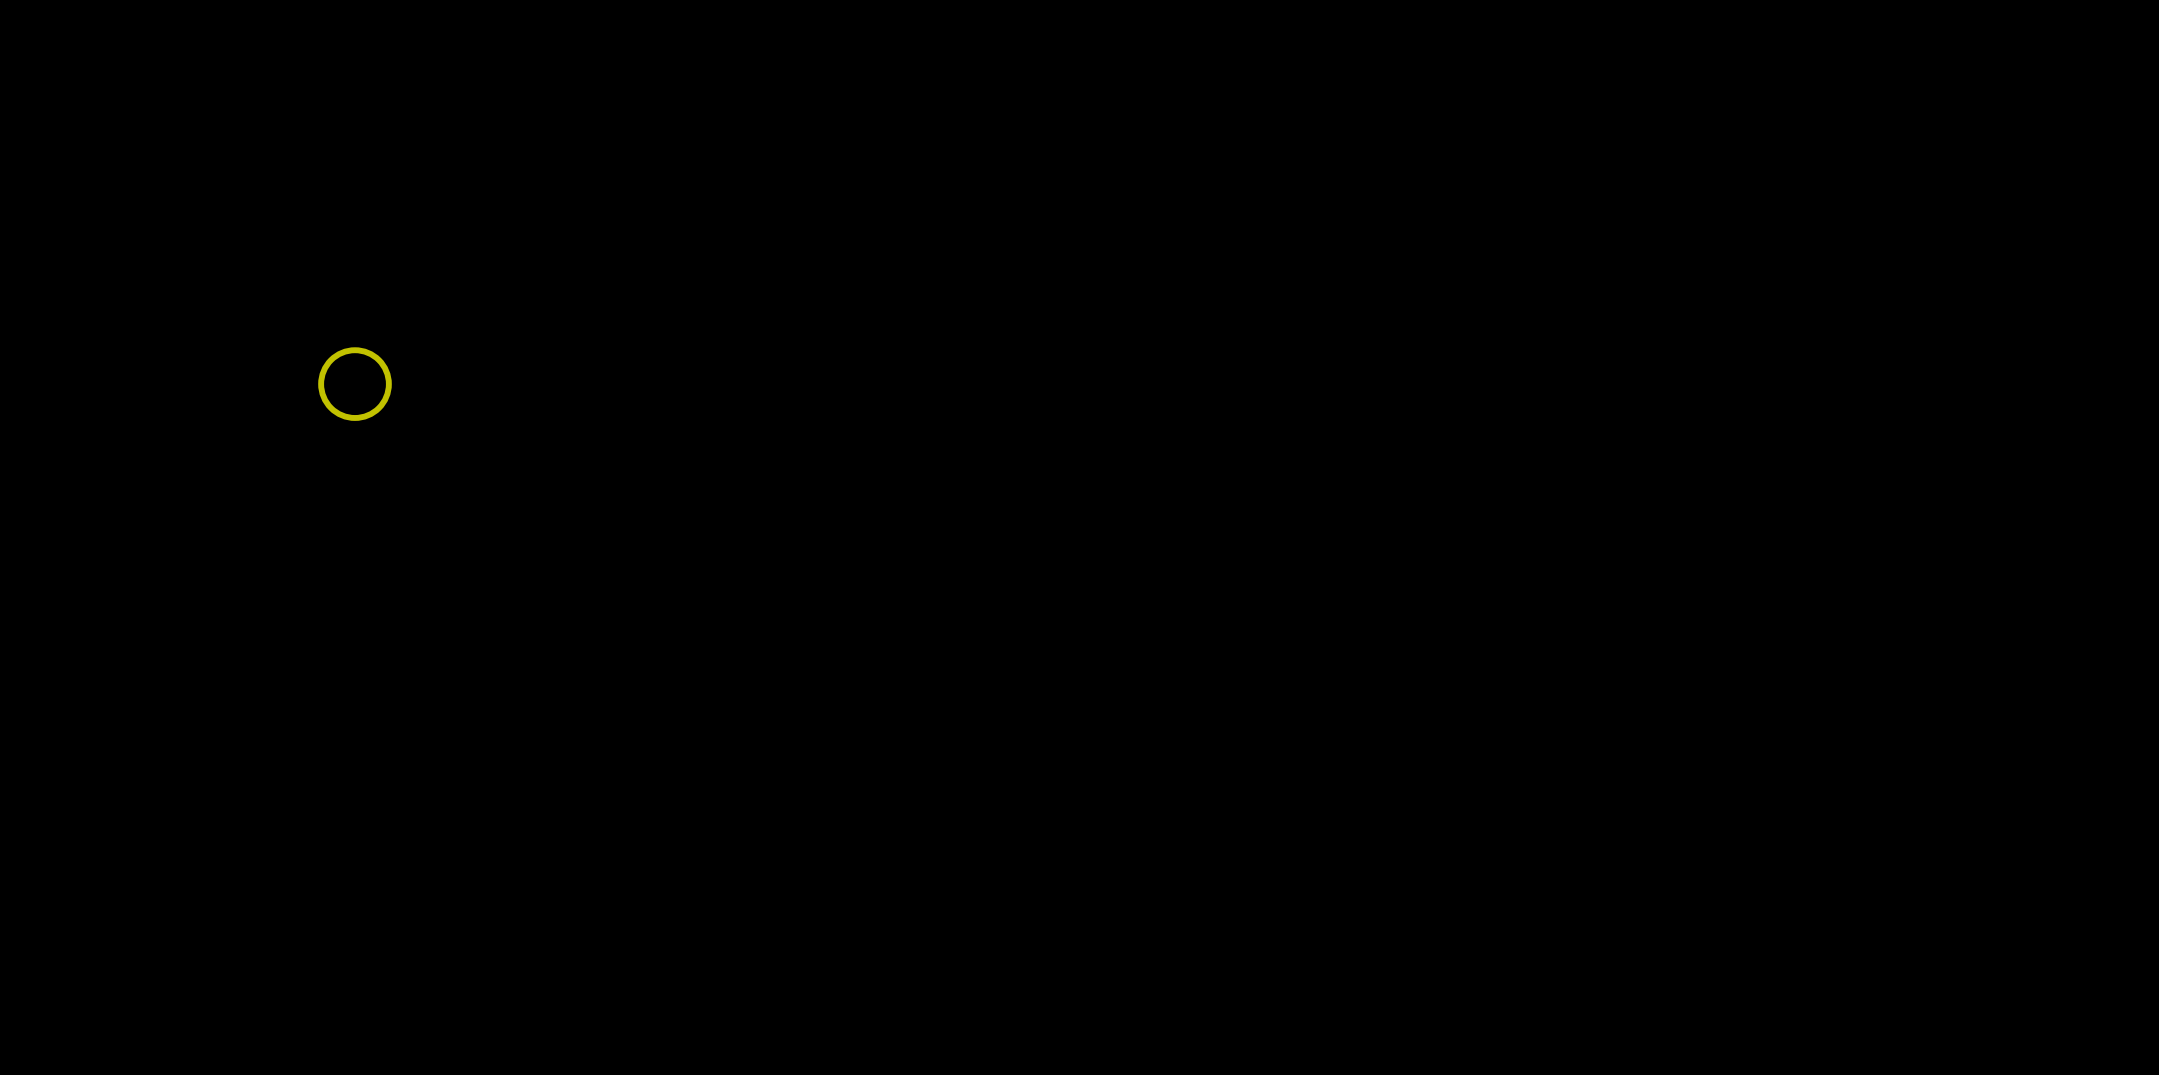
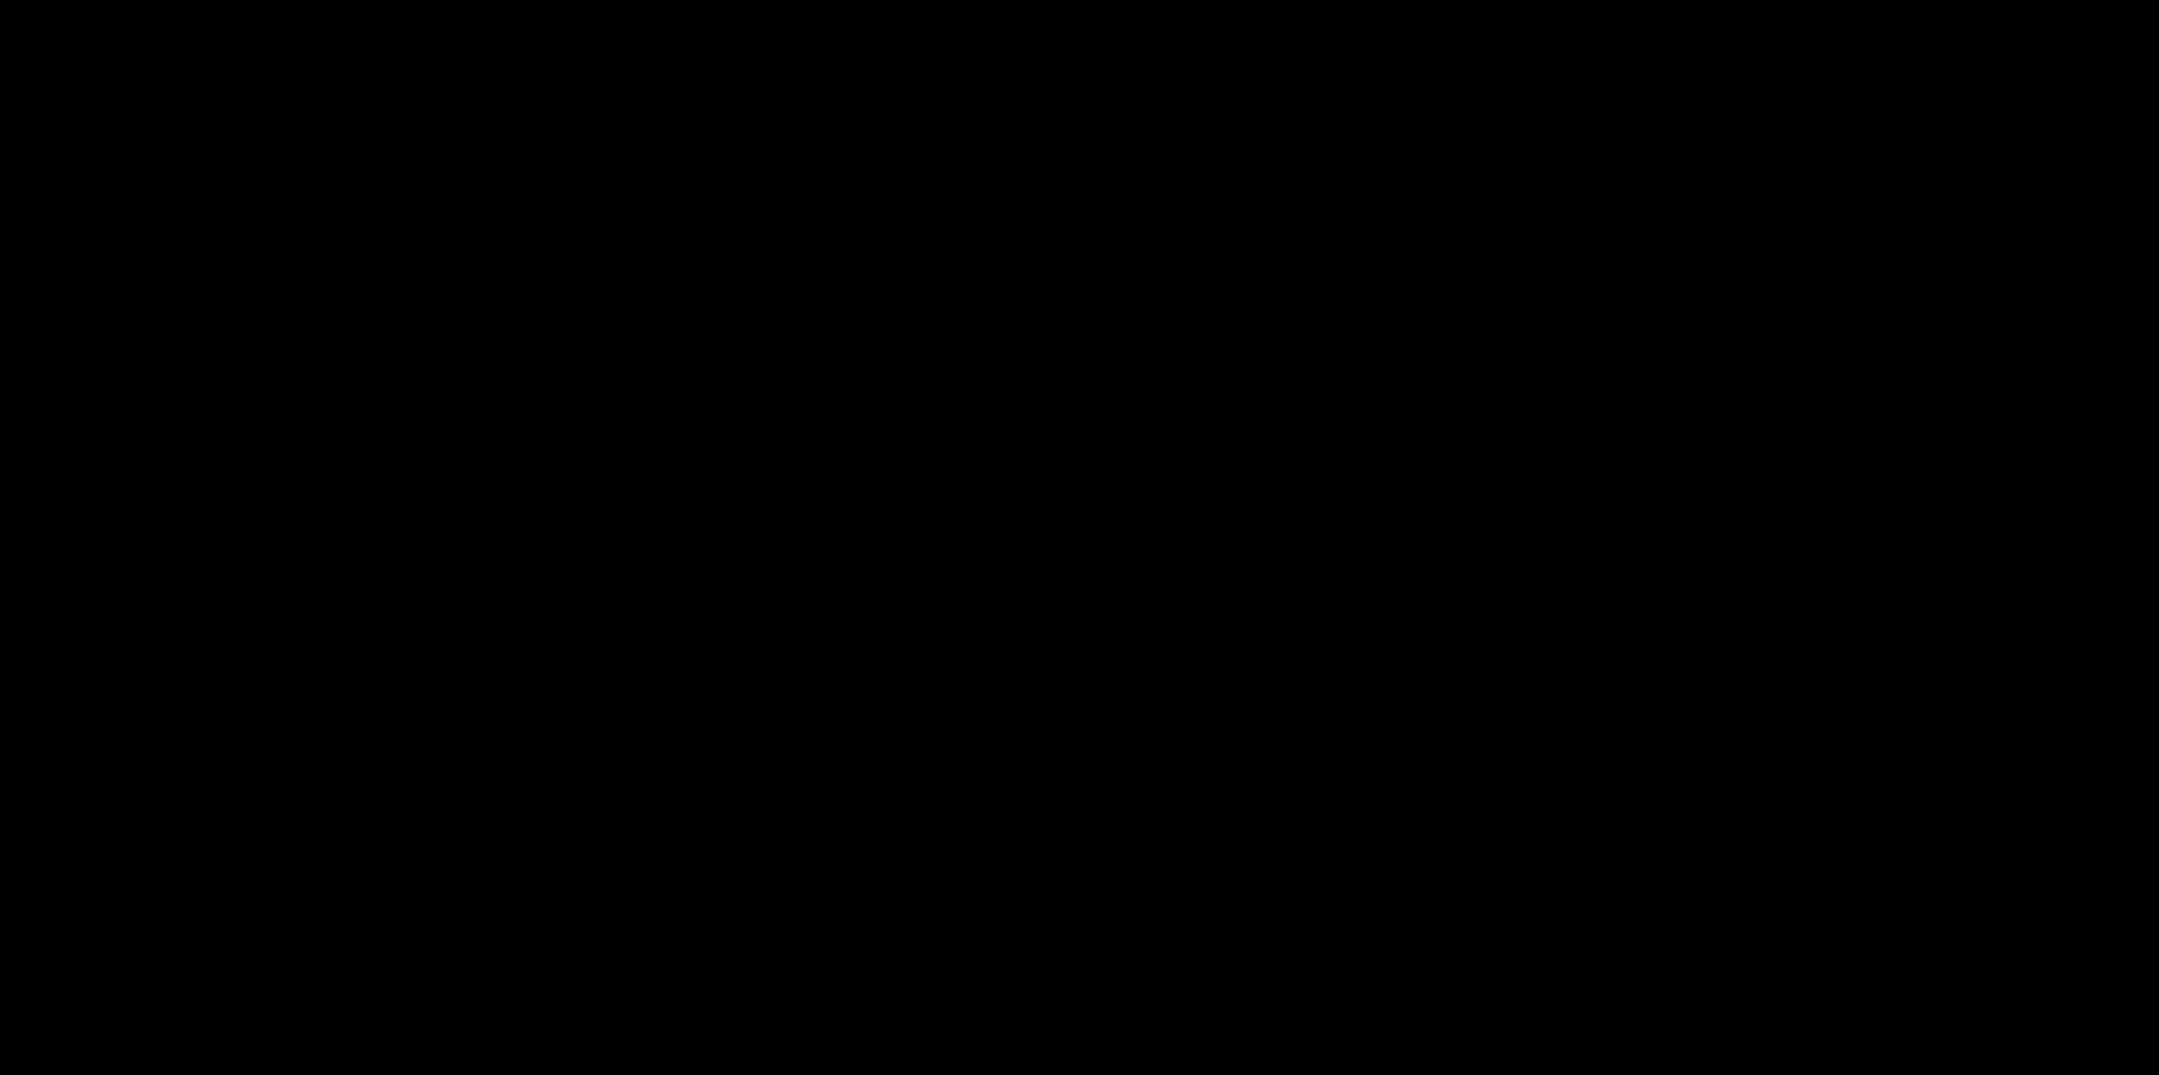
round board edge: [318, 347, 392, 421] -> none

